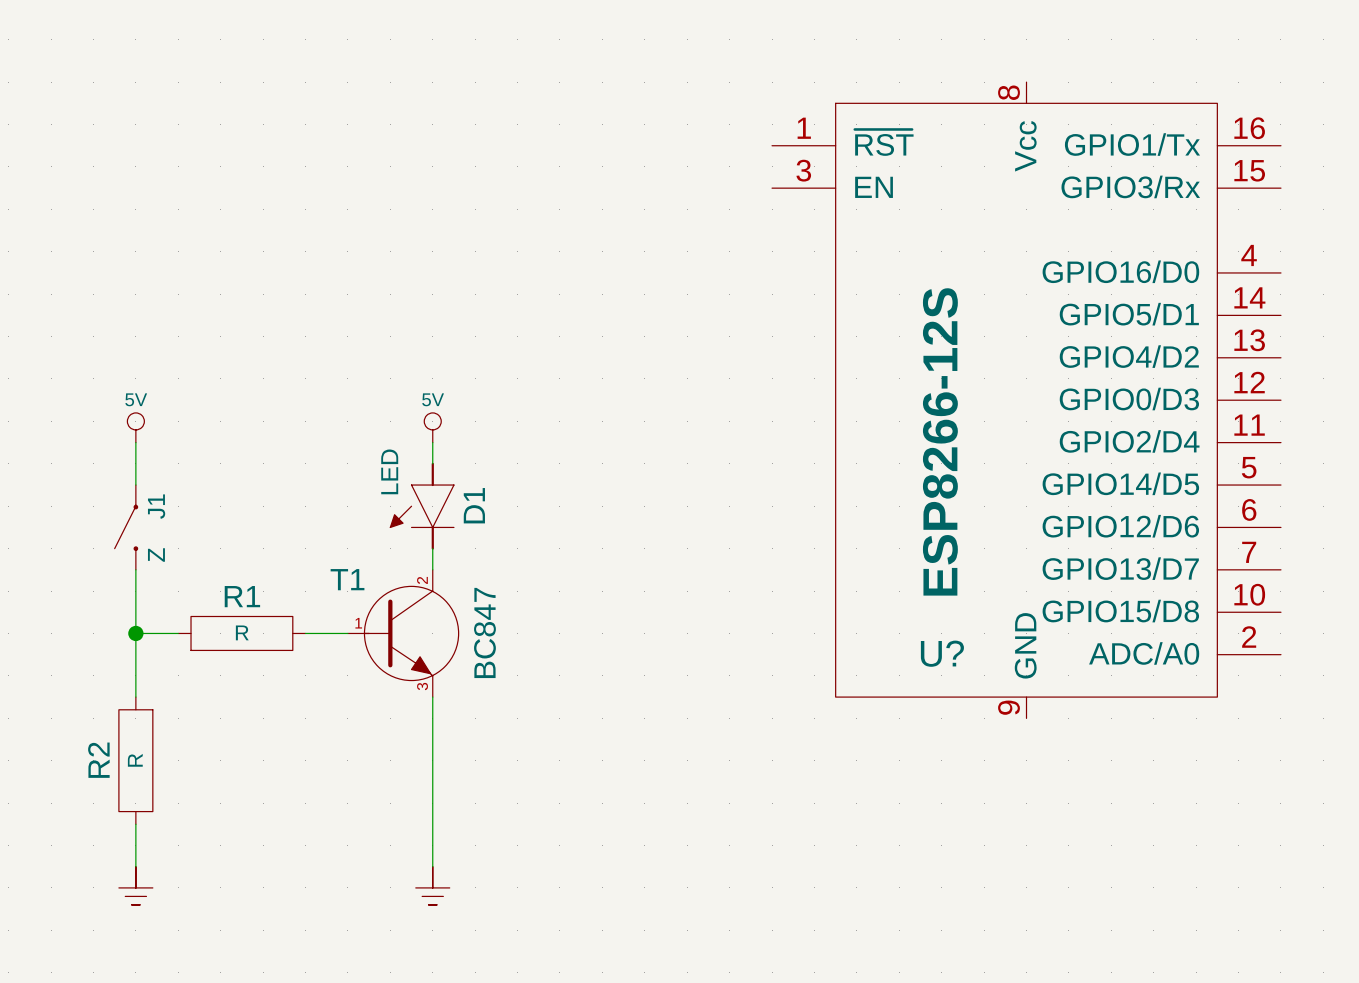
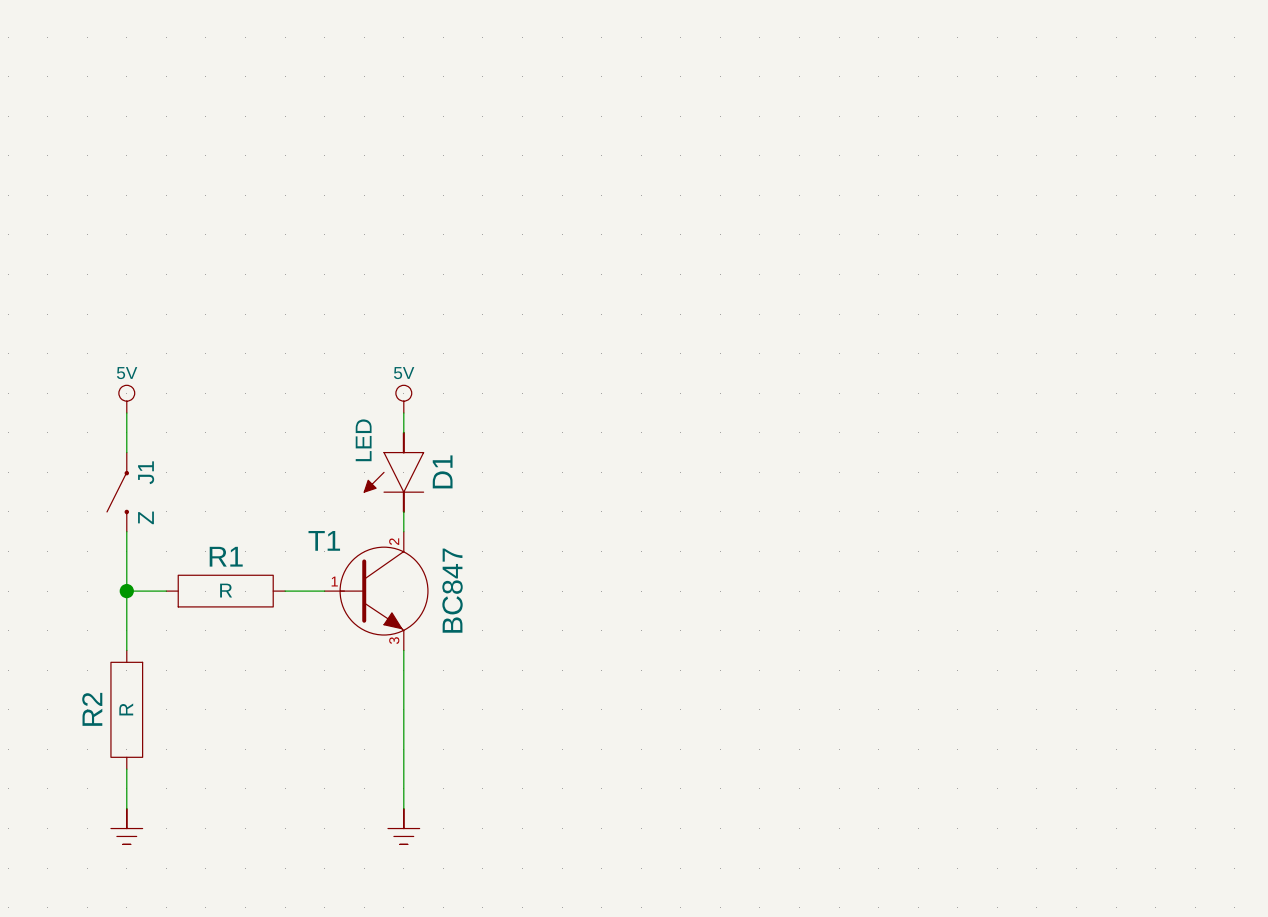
U?: ESP8266-12S (1026, 400) -> none

